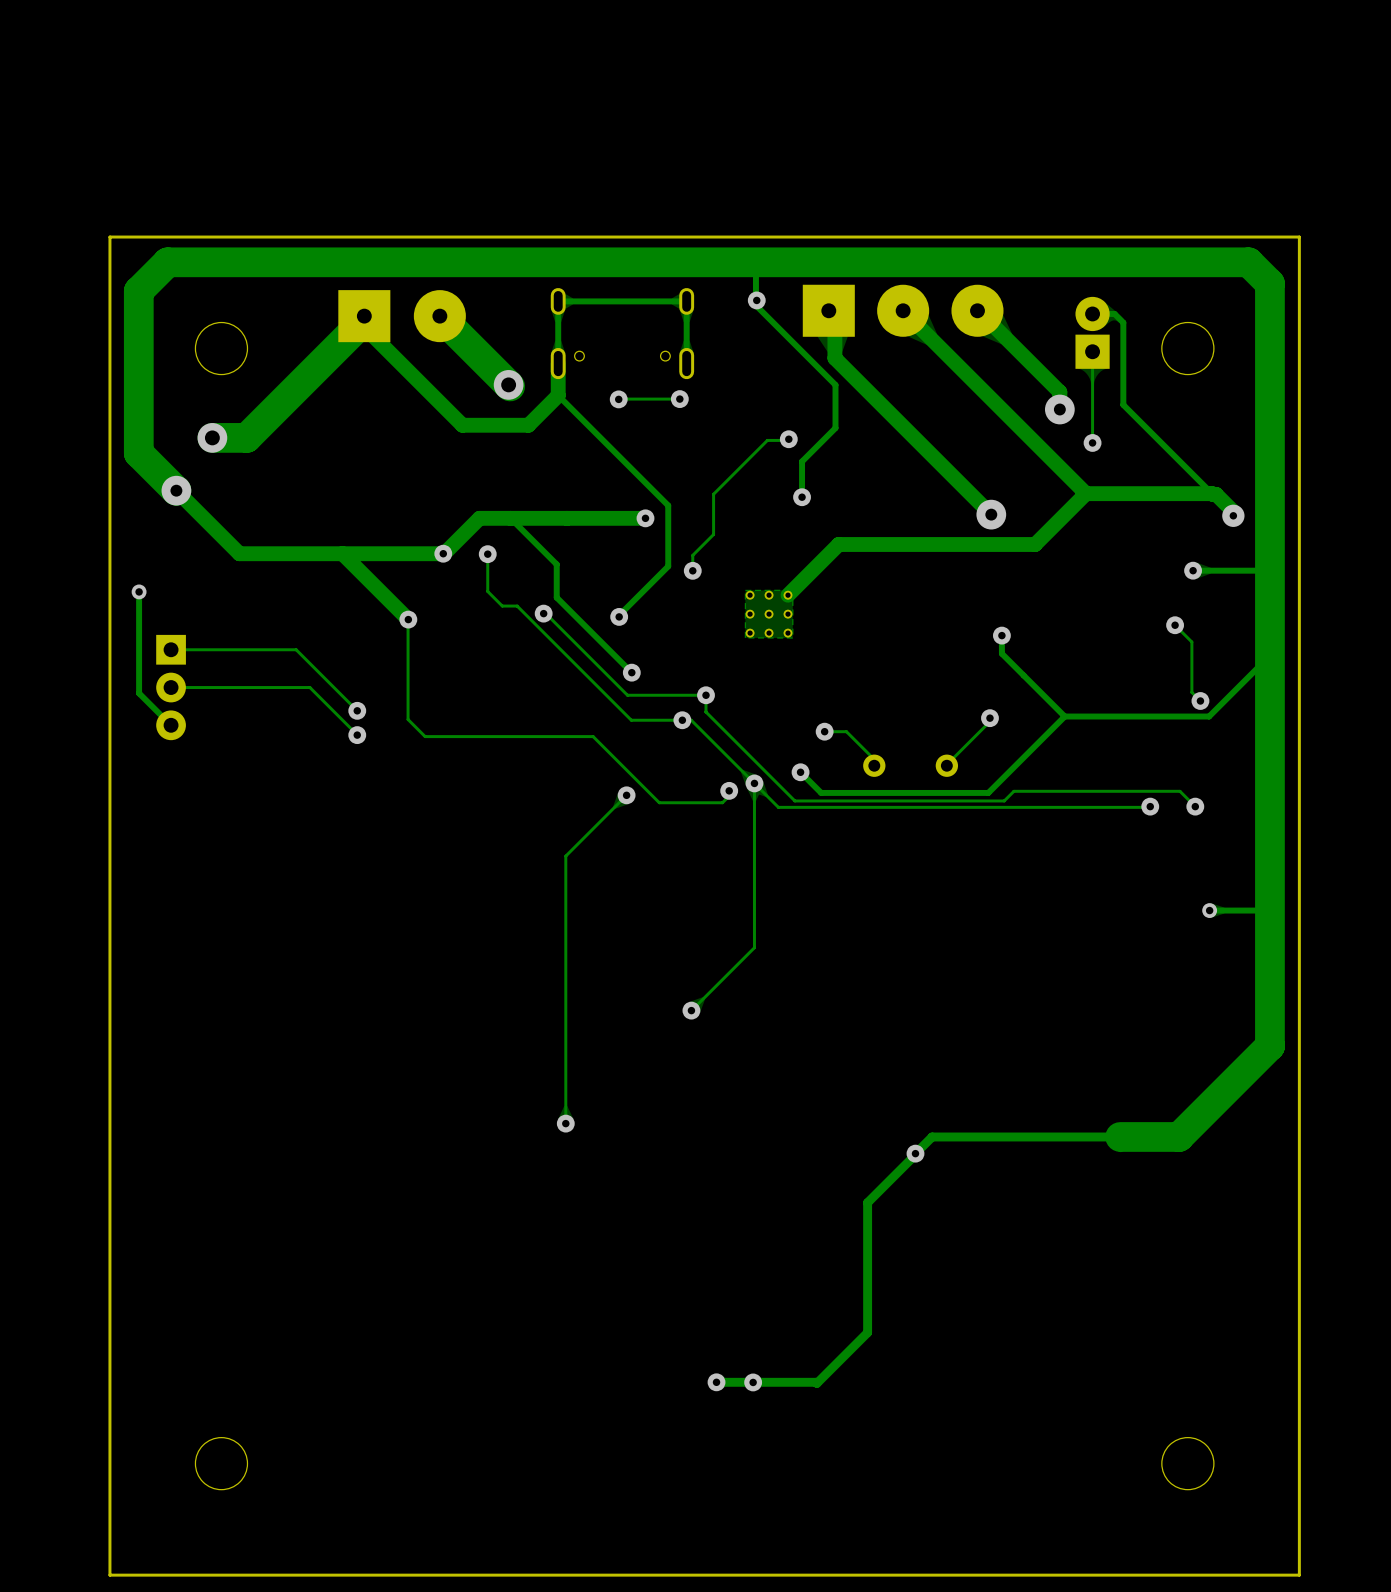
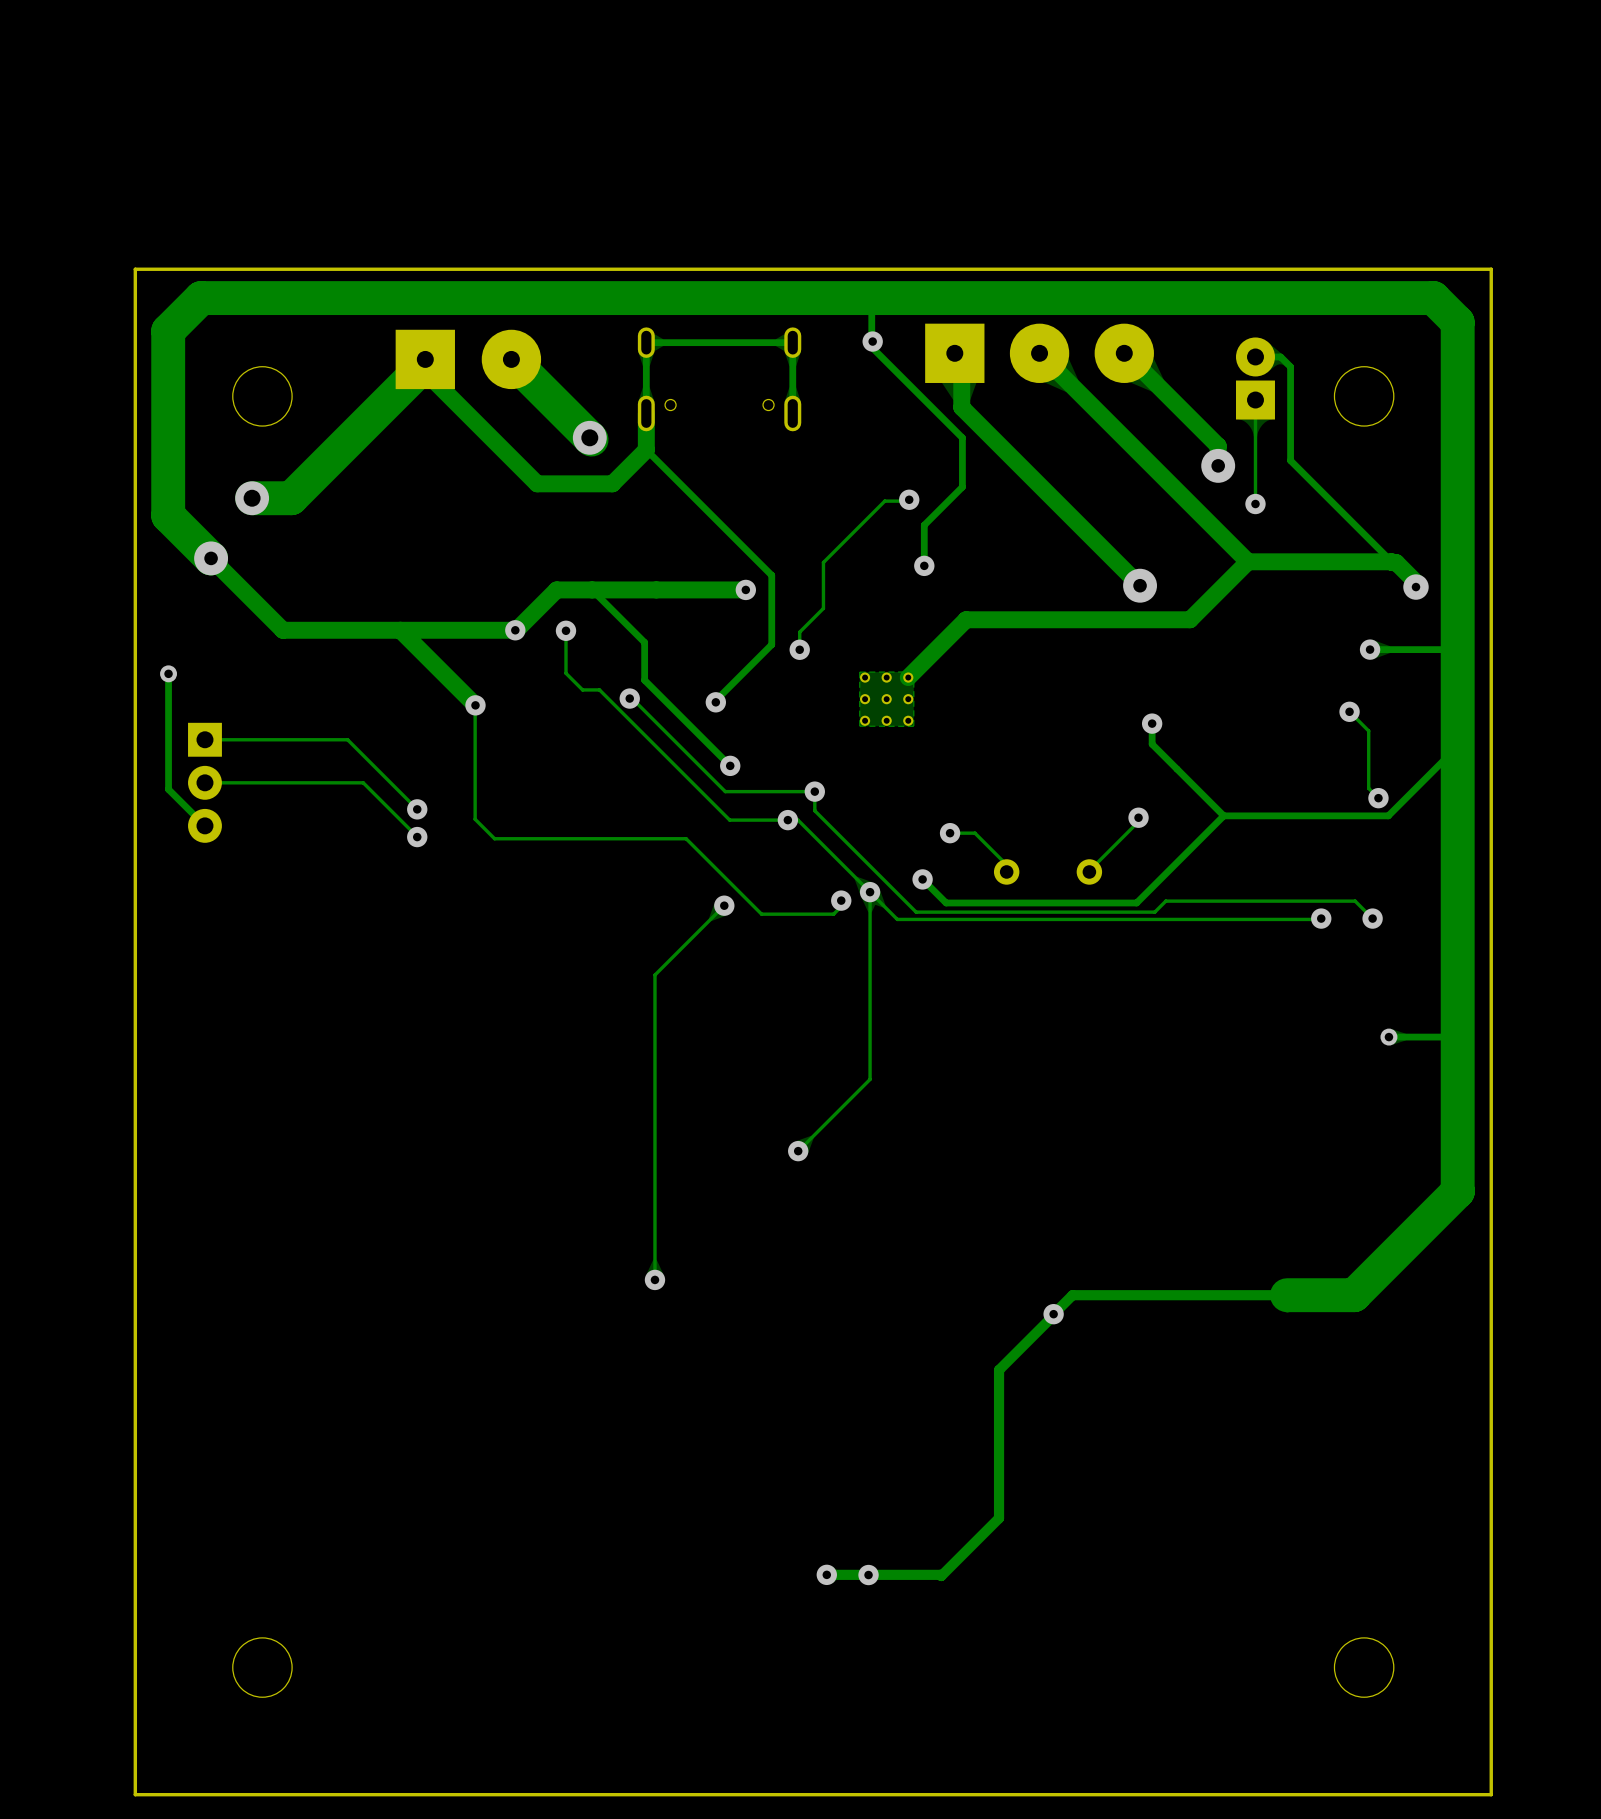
via: (618, 399) -> none
track: (679, 399) (618, 399) -> none
via: (679, 399) -> none

